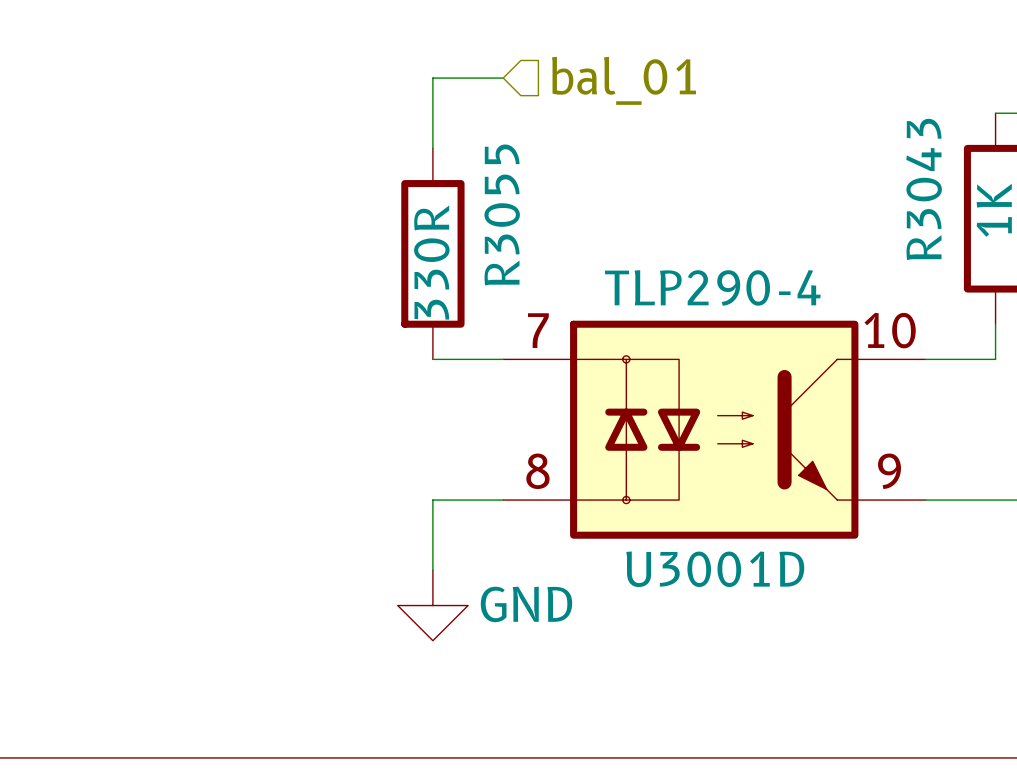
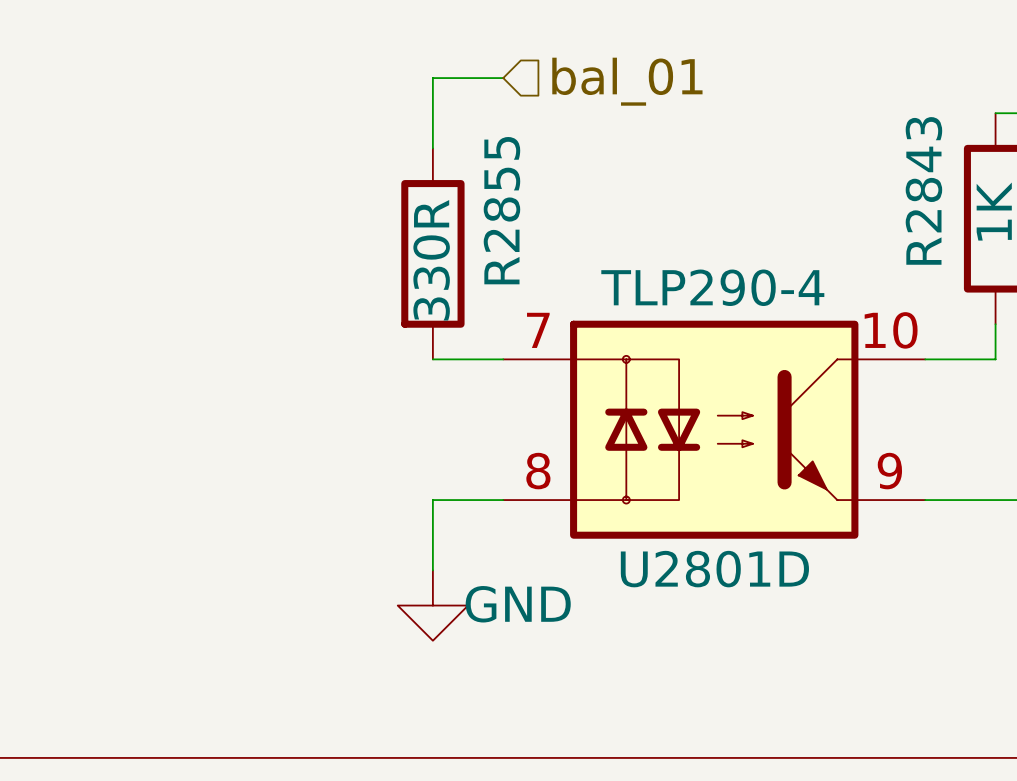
R3043 name: R3043 (924, 189) -> R2843 (923, 190)
R3055 name: R3055 (502, 214) -> R2855 (501, 210)
U3001D name: U3001D (715, 569) -> U2801D (714, 569)

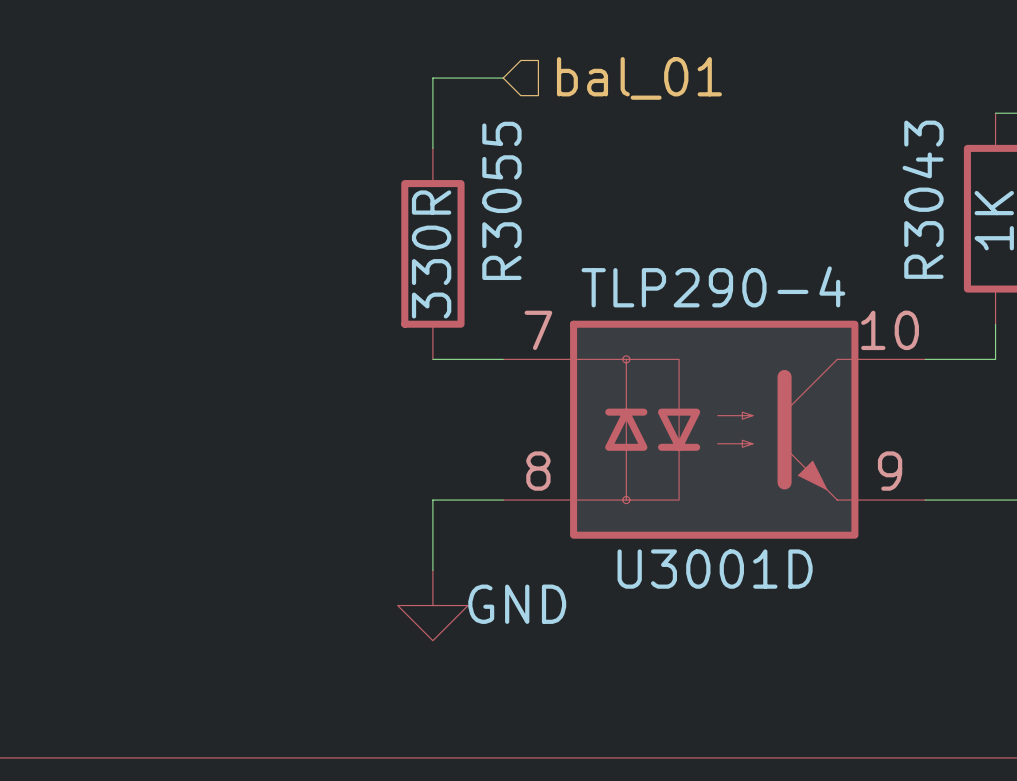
R2843 name: R2843 (923, 190) -> R3043 (923, 199)
R2855 name: R2855 (501, 210) -> R3055 (501, 200)
U2801D name: U2801D (714, 569) -> U3001D (715, 569)

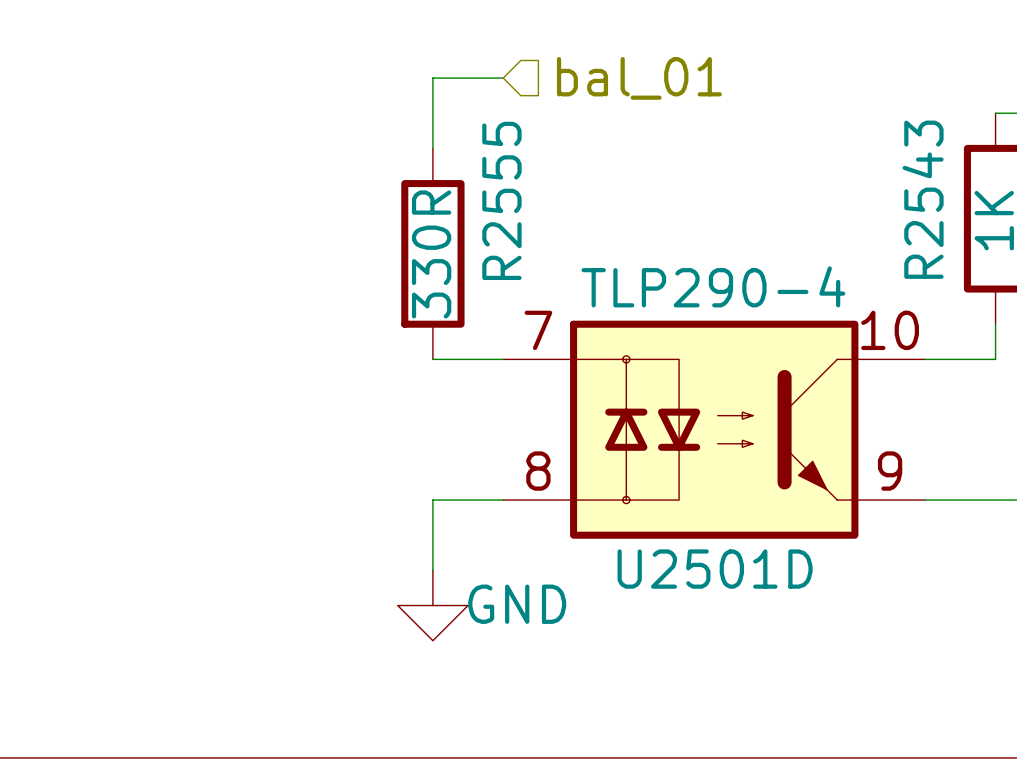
R3043 name: R3043 (923, 199) -> R2543 (923, 199)
R3055 name: R3055 (501, 200) -> R2555 (501, 200)
U3001D name: U3001D (715, 569) -> U2501D (715, 569)

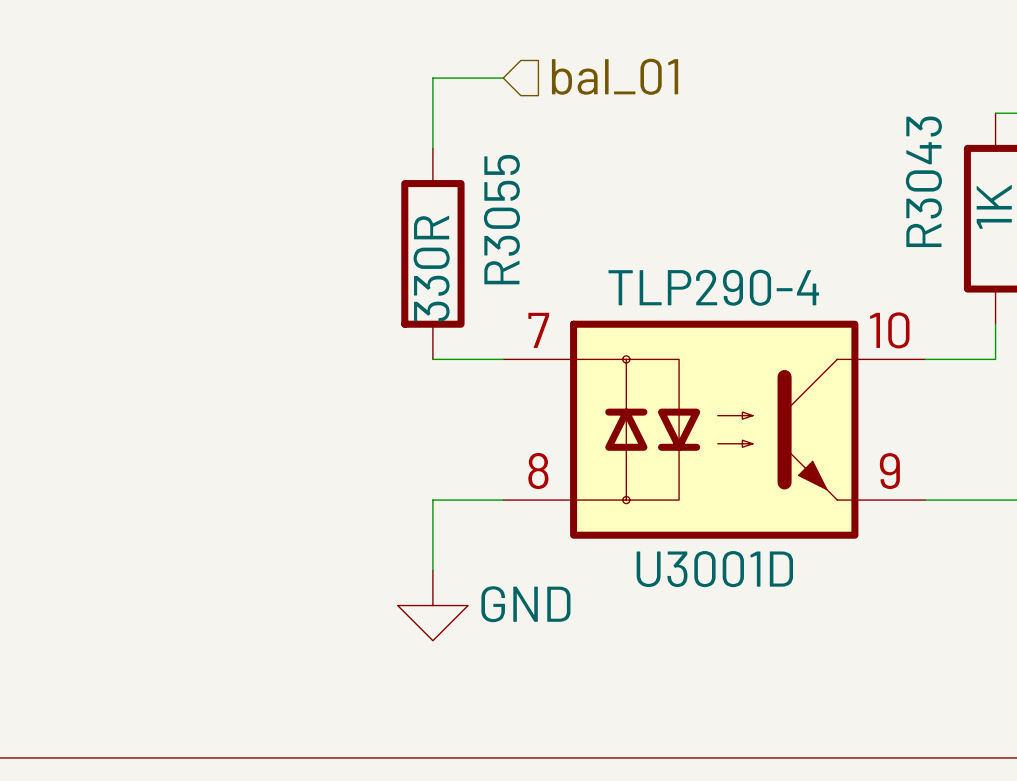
R2543 name: R2543 (923, 199) -> R3043 (923, 181)
R2555 name: R2555 (501, 200) -> R3055 (501, 219)
U2501D name: U2501D (715, 569) -> U3001D (714, 569)

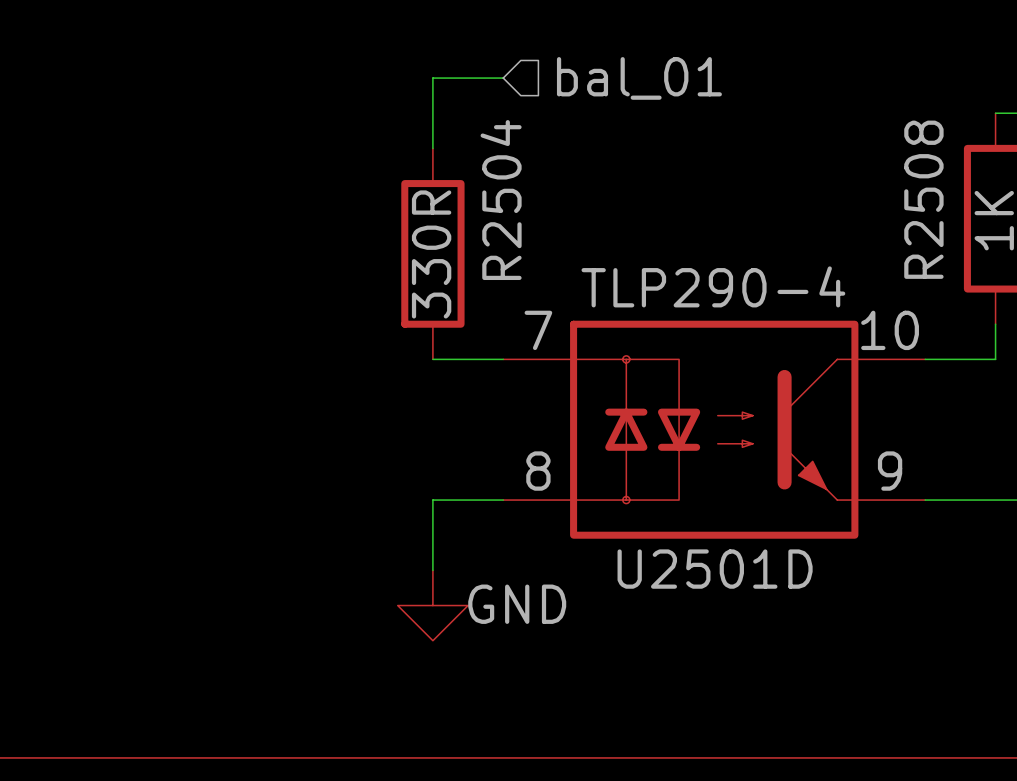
R3043 name: R3043 (923, 181) -> R2508 (923, 199)
R3055 name: R3055 (501, 219) -> R2504 (501, 200)
U3001D name: U3001D (714, 569) -> U2501D (715, 569)

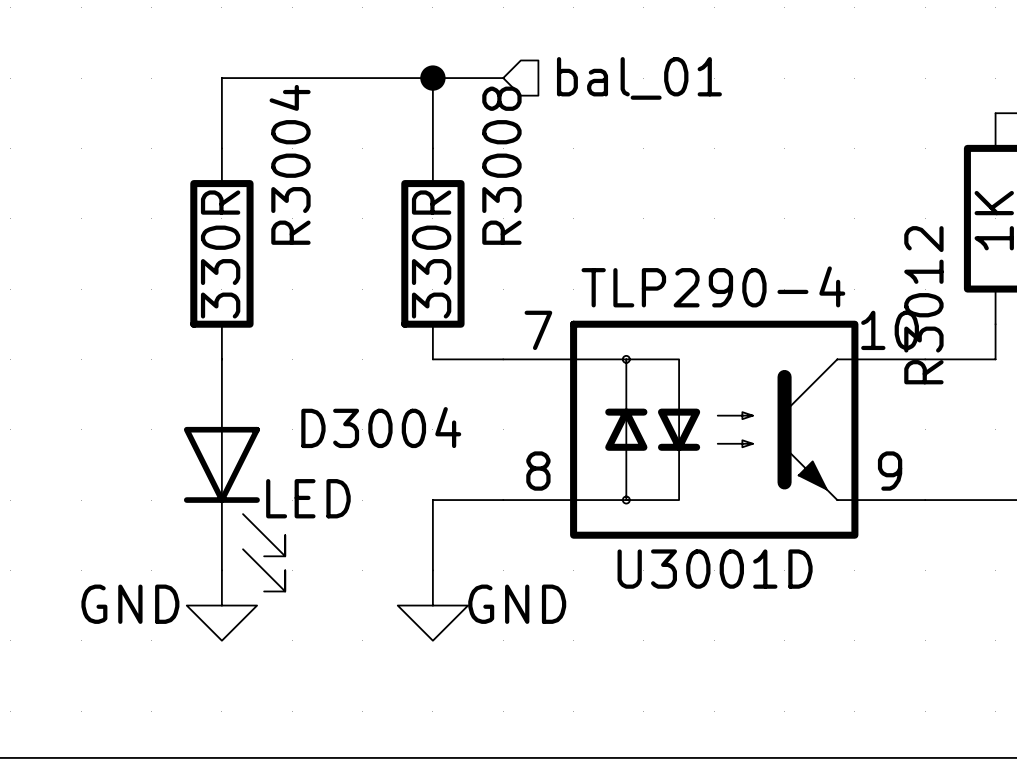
wire: none -> (432, 78) (221, 78) (221, 148)
junction: none -> (432, 78)
R2508 name: R2508 (923, 199) -> R3012 (923, 305)
R2504 name: R2504 (501, 200) -> R3008 (501, 165)
R3004: none -> 330R (221, 253)
D3004: none -> LED (234, 475)
U2501D name: U2501D (715, 569) -> U3001D (715, 569)
power symbol: none -> GND (221, 605)

